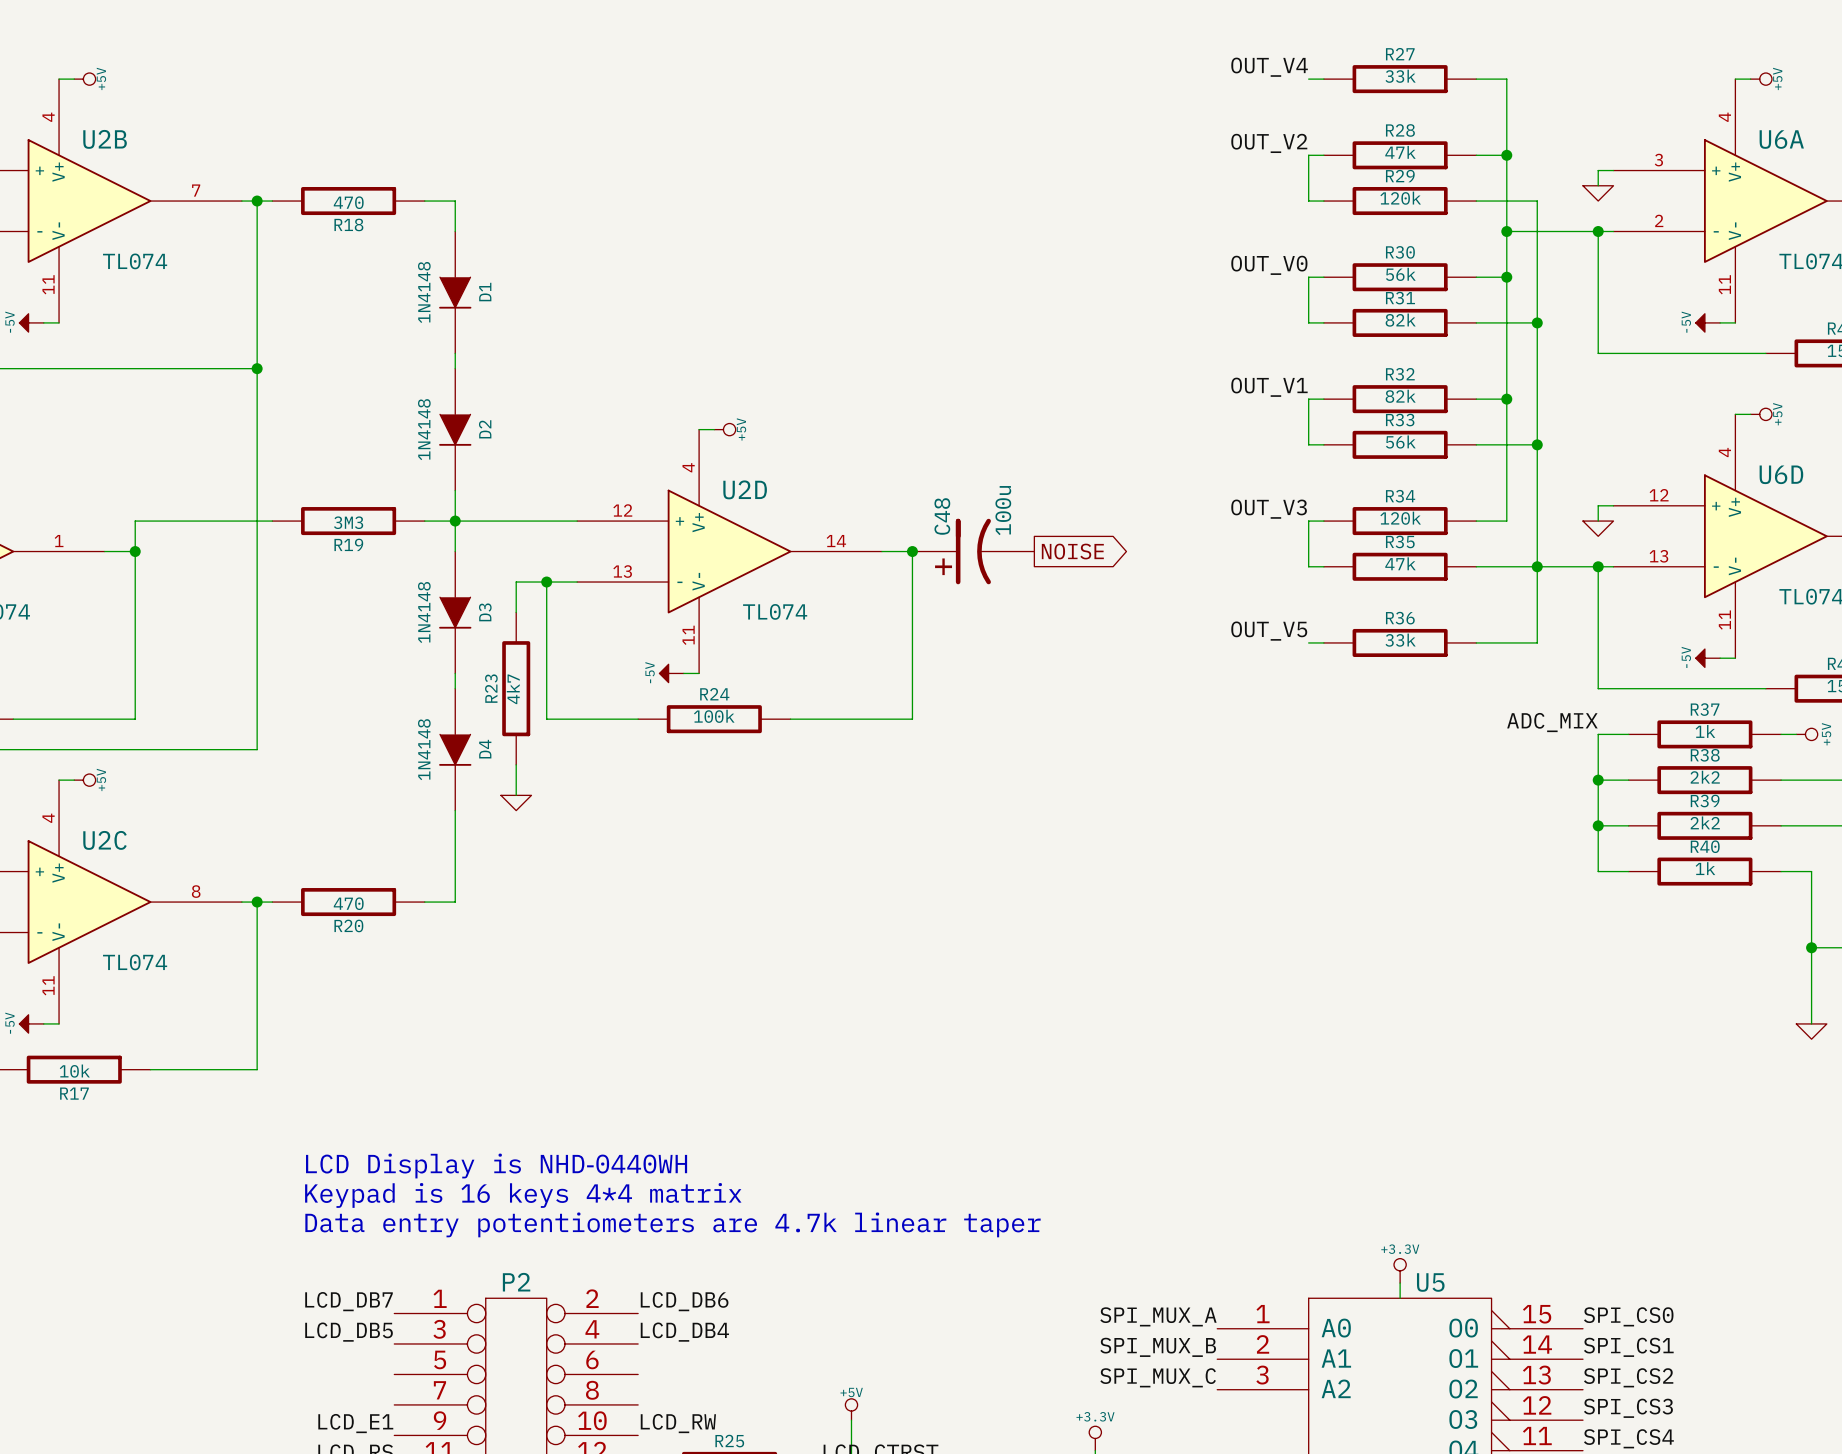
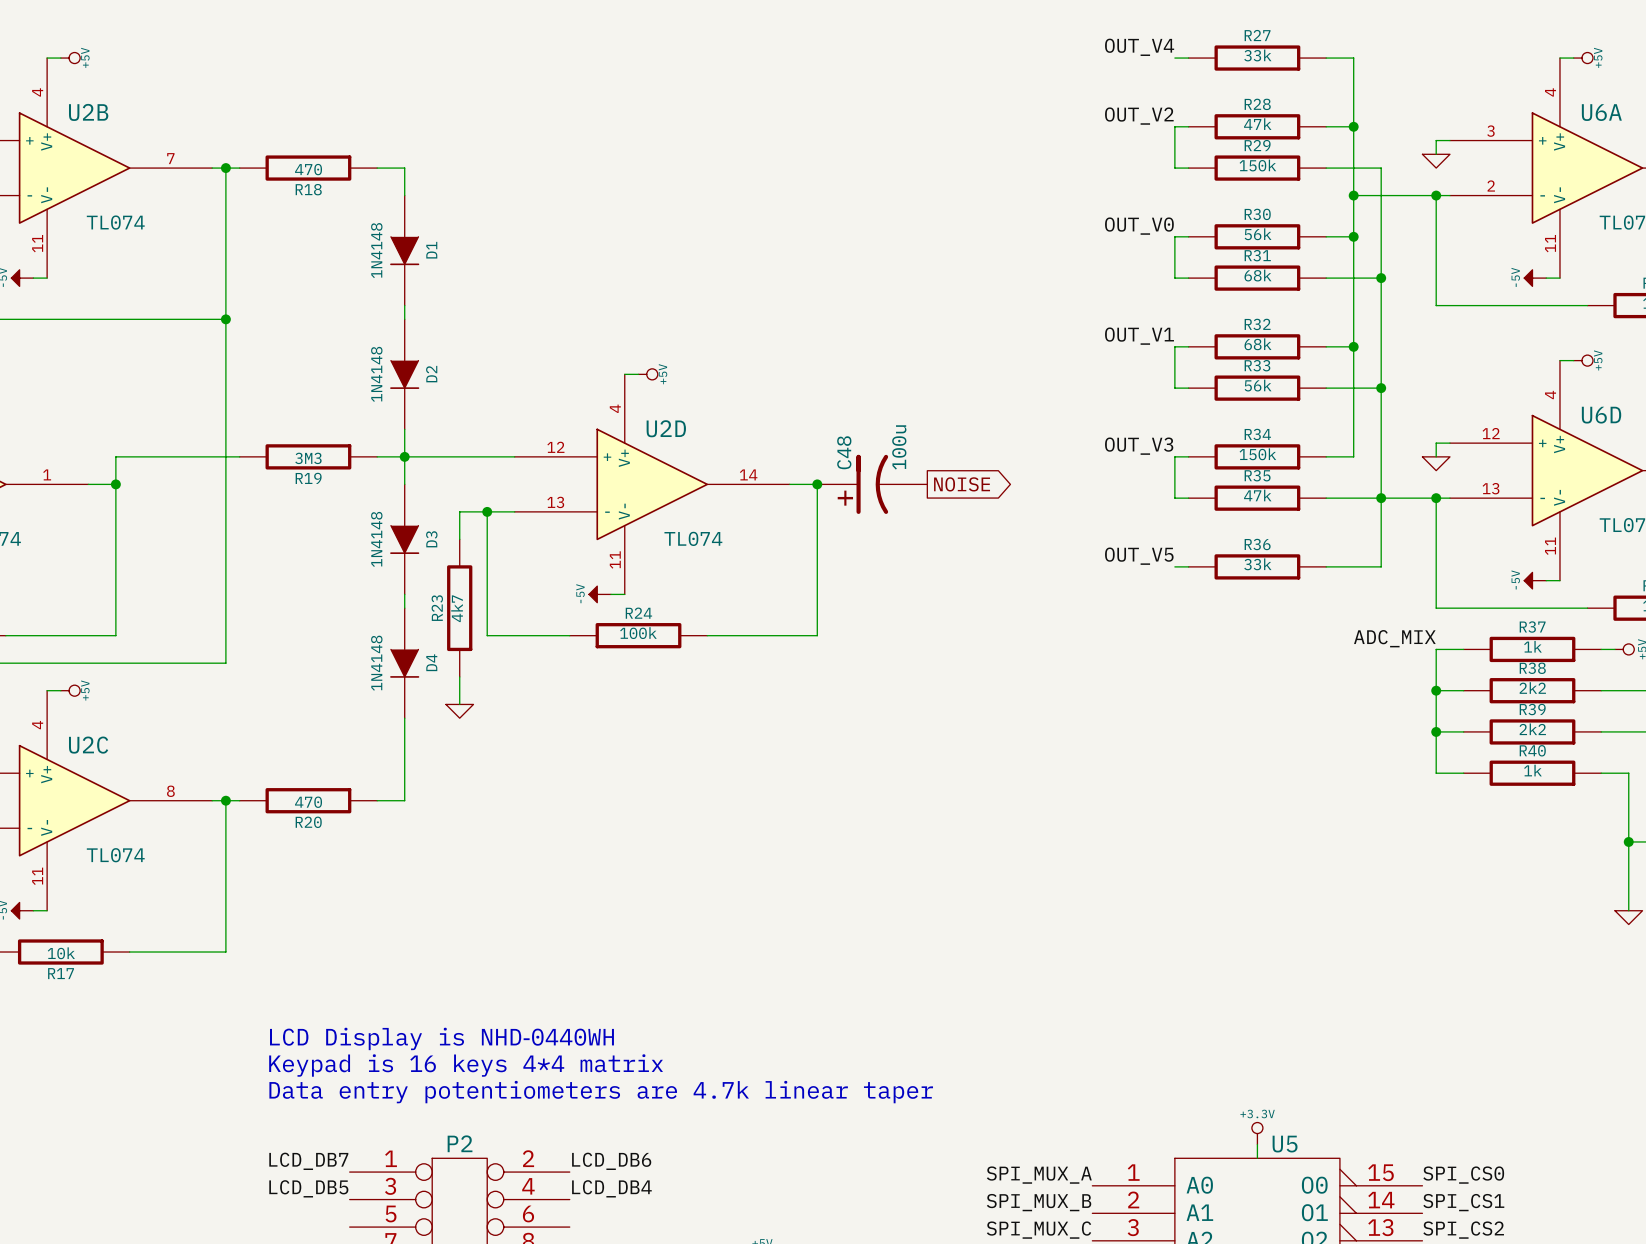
R29 value: 120k (1400, 198) -> 150k (1257, 165)
R31 value: 82k (1400, 320) -> 68k (1257, 275)
R32 value: 82k (1400, 396) -> 68k (1257, 344)
R34 value: 120k (1400, 518) -> 150k (1257, 454)

